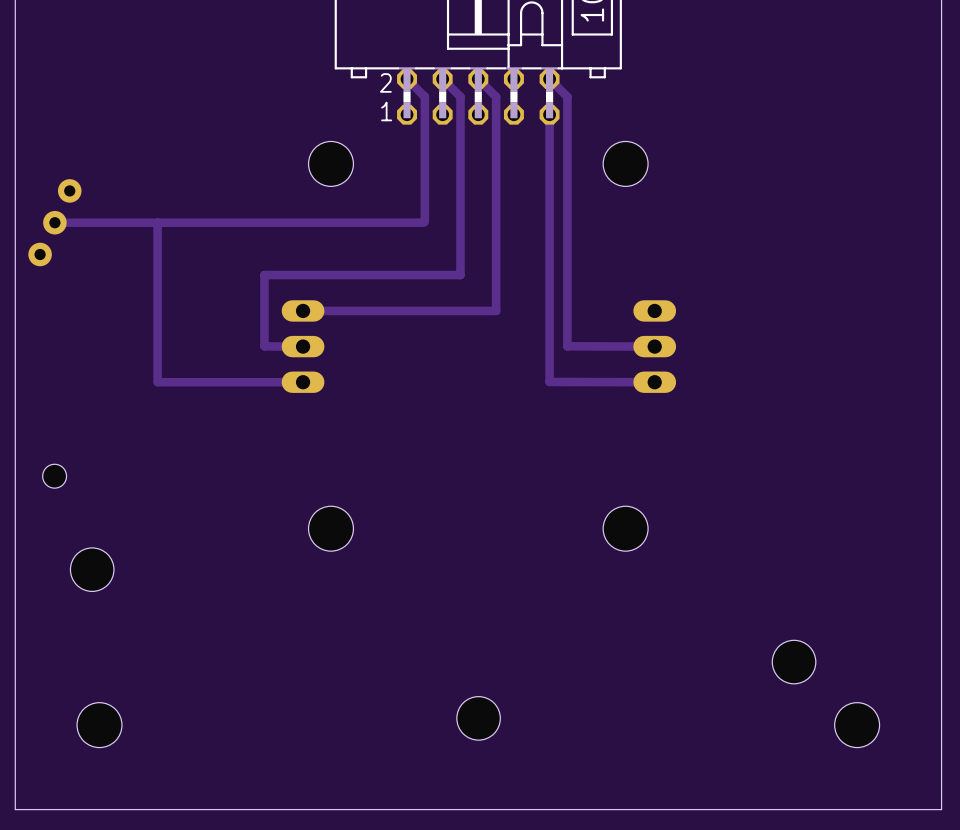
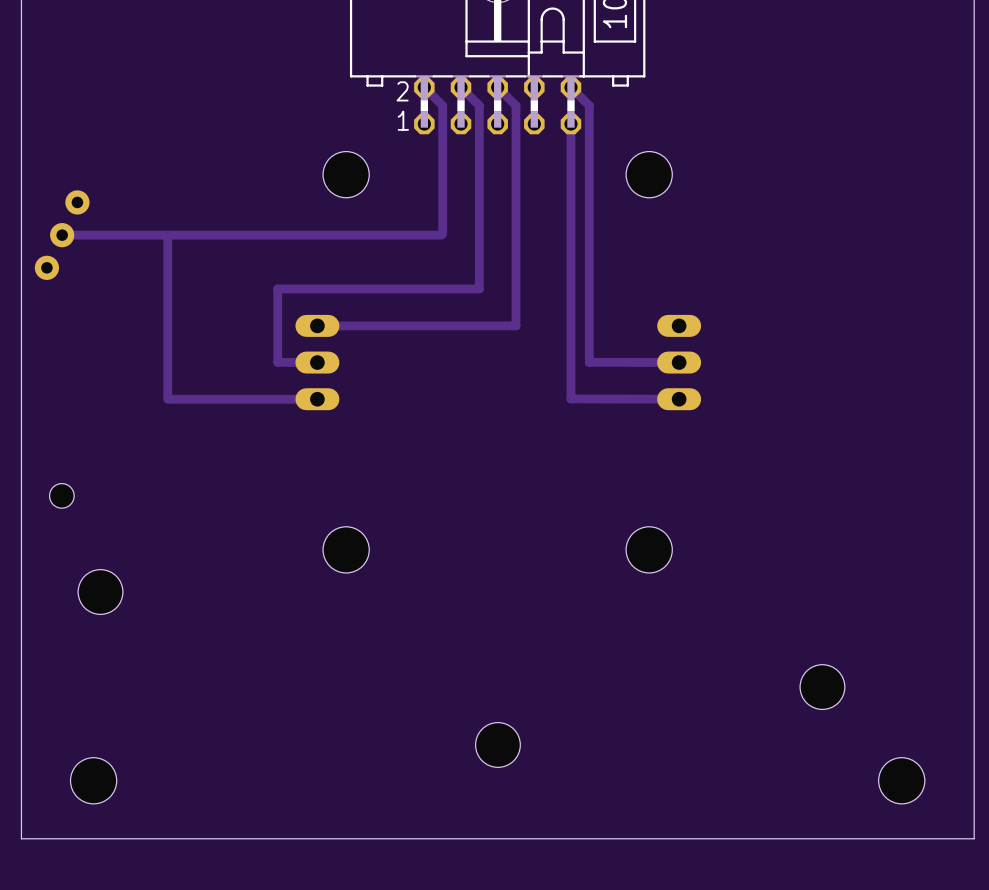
hole position: (99, 725) -> (93, 780)
hole position: (857, 725) -> (901, 780)

